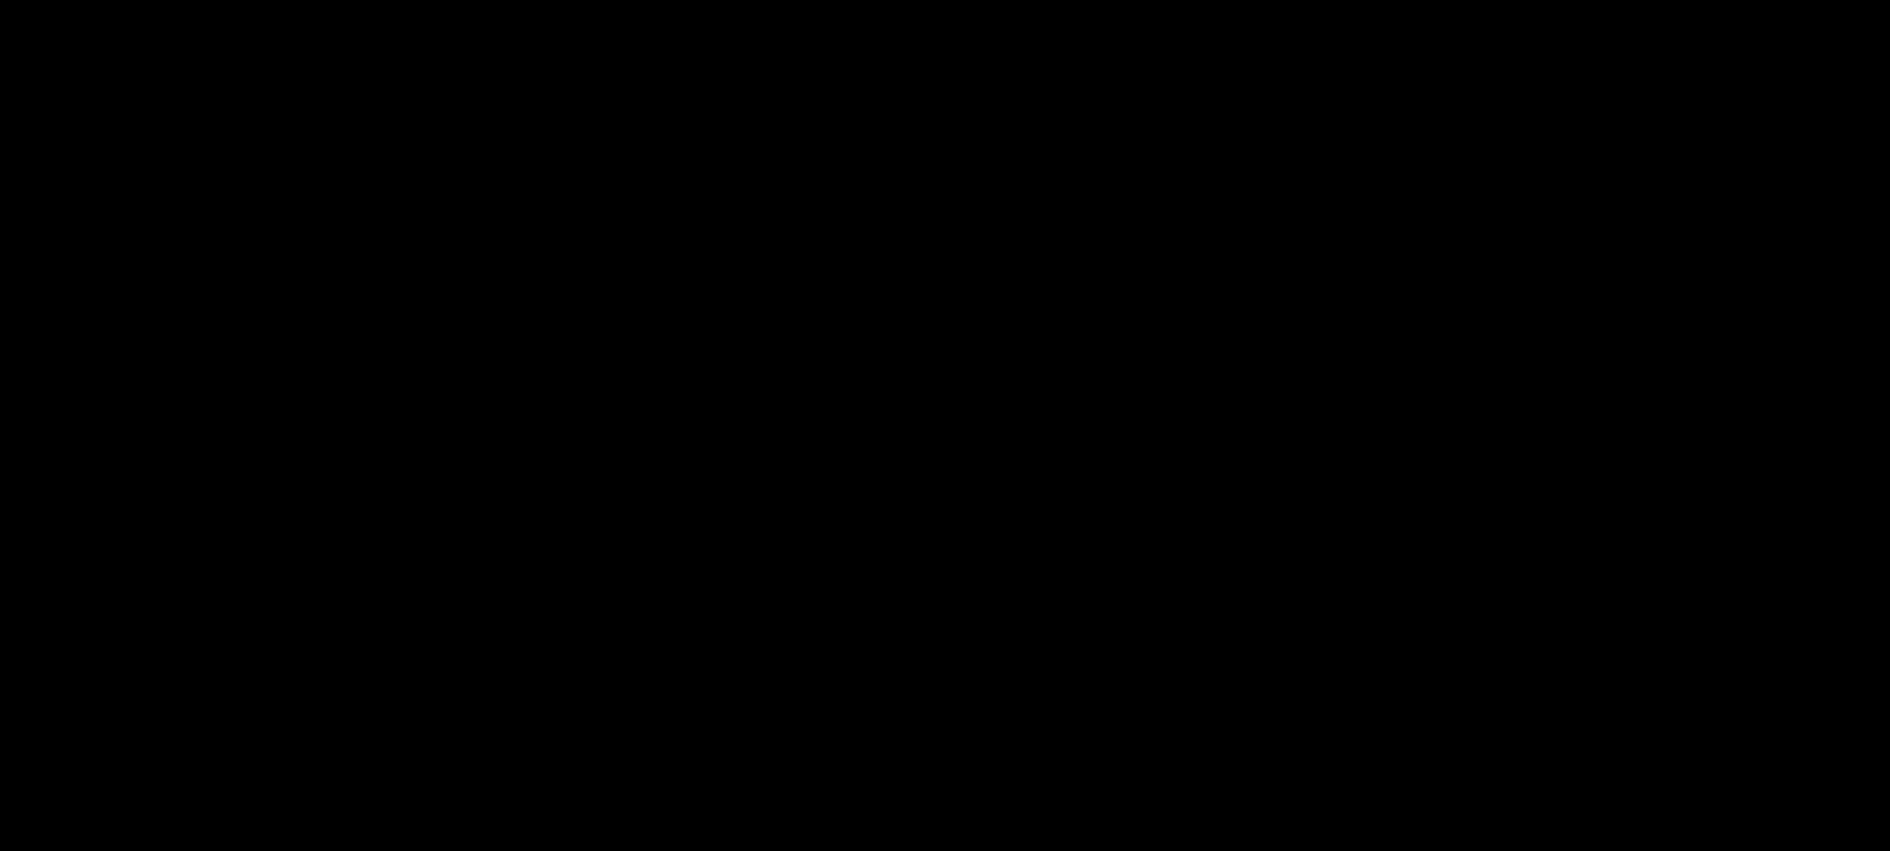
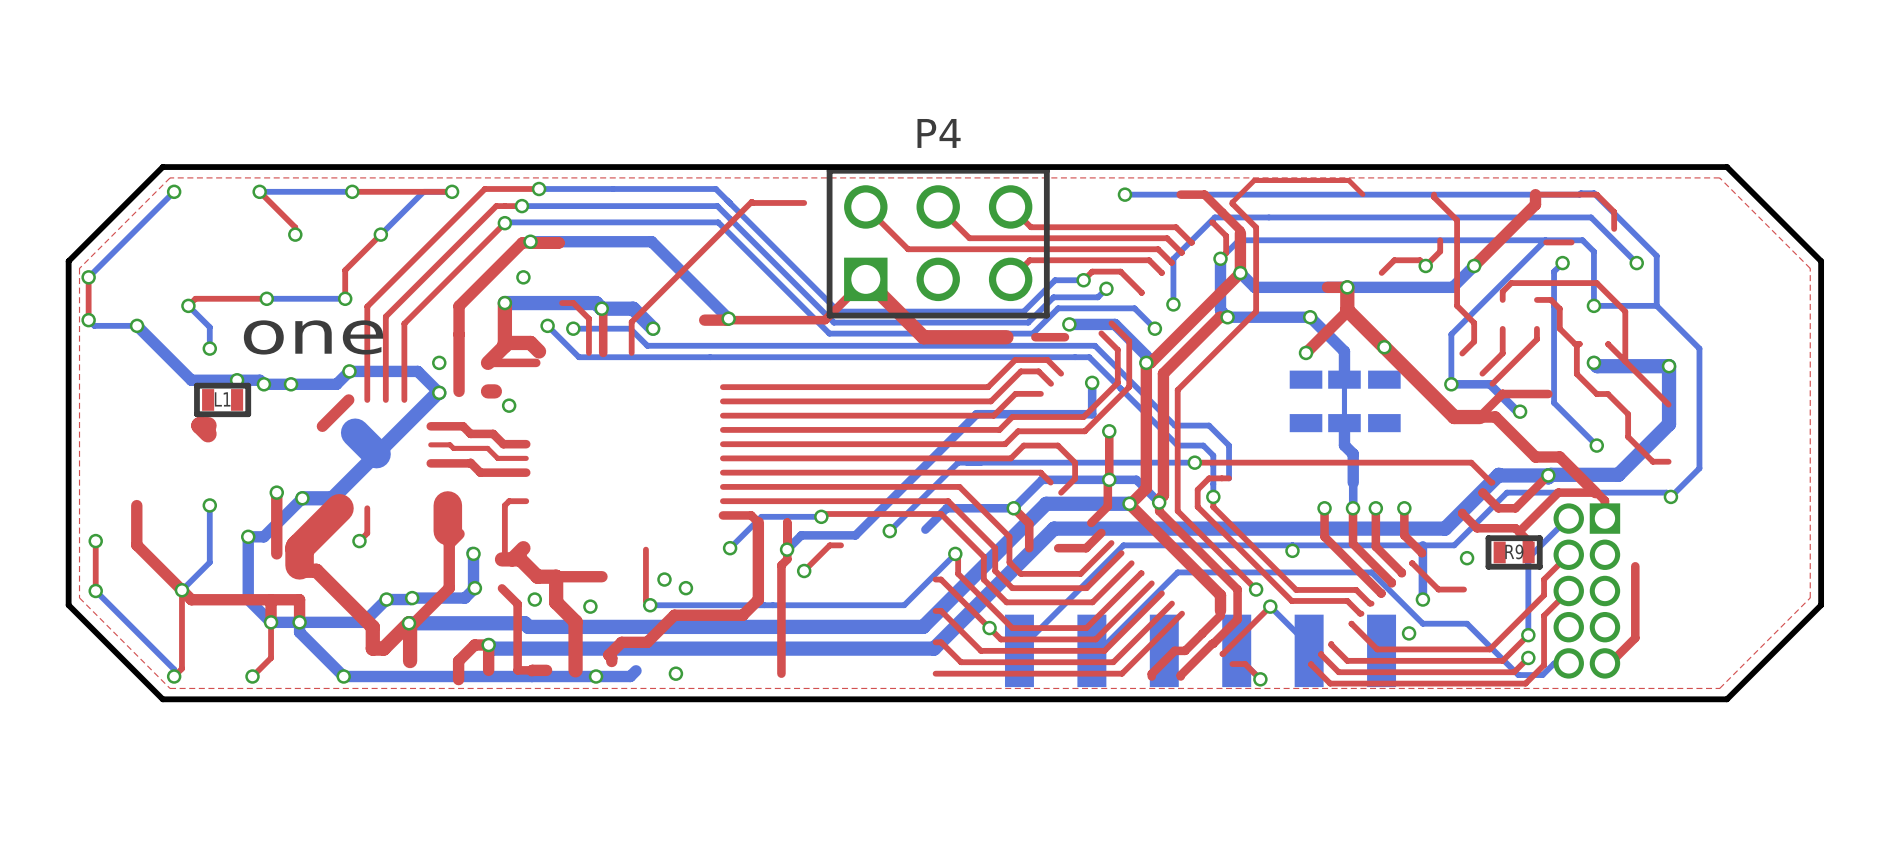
board edge: none -> (162, 167) (1726, 167) (1821, 261) (1821, 605) (1726, 699) (162, 699) (68, 605) (68, 261) (162, 167)
top zone outline: none -> (170, 177) (1719, 177) (1810, 268) (1810, 597) (1719, 688) (170, 688) (79, 597) (79, 268) (170, 177)
top track: none -> (539, 189) (484, 189) (367, 306) (367, 399)
bottom track: none -> (539, 189) (715, 189) (838, 311) (1023, 311) (1055, 280) (1083, 280)
via: none -> (539, 189)
bottom track: none -> (174, 191) (88, 277)
via: none -> (174, 191)
top track: none -> (259, 191) (295, 227) (295, 234)
bottom track: none -> (259, 191) (352, 191)
via: none -> (259, 191)
top track: none -> (352, 191) (452, 191)
via: none -> (352, 191)
bottom track: none -> (452, 191) (423, 191) (380, 234)
via: none -> (452, 191)
bottom track: none -> (1124, 194) (1594, 193) (1656, 255) (1656, 305)
via: none -> (1124, 194)
top track: none -> (1180, 194) (1204, 194) (1240, 230) (1240, 273) (1150, 362) (1146, 362) (1146, 488) (1129, 503)
top track: none -> (1362, 194) (1348, 180) (1254, 180) (1232, 202) (1256, 227) (1256, 311) (1177, 390) (1177, 511) (1256, 589)
top track: none -> (1434, 194) (1434, 197) (1457, 220) (1457, 305) (1474, 322) (1474, 341) (1462, 353)
top track: none -> (804, 202) (751, 201) (631, 321) (631, 352)
top track: none -> (521, 206) (496, 206) (385, 316) (385, 399)
bottom track: none -> (521, 206) (717, 206) (833, 322) (1028, 322) (1053, 297) (1097, 297) (1106, 288)
via: none -> (521, 206)
top track: none -> (865, 206) (908, 249) (1158, 249) (1171, 262)
top track: none -> (938, 206) (969, 238) (1167, 238) (1181, 252)
top track: none -> (1010, 206) (1030, 227) (1176, 227) (1192, 242)
top track: none -> (1212, 222) (1226, 236) (1226, 253) (1220, 258)
top track: none -> (504, 223) (404, 323) (404, 399)
bottom track: none -> (504, 223) (718, 222) (829, 333) (1032, 333) (1058, 308) (1134, 308) (1154, 328)
via: none -> (504, 223)
top track: none -> (1614, 228) (1614, 212) (1596, 194) (1535, 194) (1535, 204) (1474, 265)
via: none -> (295, 234)
top track: none -> (380, 234) (345, 270) (345, 298)
via: none -> (380, 234)
top track: none -> (1440, 240) (1440, 251) (1425, 265) (1420, 260) (1394, 260) (1381, 272)
bottom track: none -> (1545, 240) (1451, 334) (1451, 384) (1489, 384) (1517, 411) (1520, 411)
bottom track: none -> (530, 241) (651, 241) (728, 318)
via: none -> (530, 241)
top track: none -> (559, 242) (522, 242) (459, 306) (459, 391)
top track: none -> (1546, 242) (1571, 242)
P4: none -> (938, 243)
via: none -> (1220, 258)
bottom track: none -> (1562, 263) (1554, 271) (1554, 402) (1596, 445)
via: none -> (1562, 263)
bottom track: none -> (1636, 263) (1591, 217) (1214, 217) (1173, 258) (1173, 304)
via: none -> (1636, 263)
via: none -> (1425, 265)
bottom track: none -> (1474, 265) (1452, 287) (1254, 287) (1240, 273)
via: none -> (1474, 265)
top track: none -> (1161, 272) (1149, 260) (1029, 260) (1010, 279)
via: none -> (1240, 273)
top track: none -> (88, 277) (88, 320)
via: none -> (88, 277)
via: none -> (523, 277)
top track: none -> (1083, 280) (1092, 271) (1120, 271) (1141, 292)
via: none -> (1083, 280)
top track: none -> (1327, 287) (1347, 287) (1347, 310)
via: none -> (1347, 287)
via: none -> (1106, 288)
top track: none -> (266, 298) (195, 298) (188, 305)
bottom track: none -> (266, 298) (345, 298)
via: none -> (266, 298)
via: none -> (345, 298)
top track: none -> (1502, 299) (1502, 291) (1511, 283) (1596, 283) (1625, 311) (1625, 361)
top track: none -> (1536, 299) (1550, 299) (1559, 308) (1559, 328) (1575, 344) (1579, 344)
top track: none -> (504, 303) (504, 346) (488, 362) (536, 362)
bottom track: none -> (504, 303) (596, 303) (601, 308) (633, 308) (653, 328)
via: none -> (504, 303)
top track: none -> (562, 303) (573, 303) (588, 318) (588, 352)
via: none -> (1173, 304)
bottom track: none -> (188, 305) (209, 327) (209, 348)
via: none -> (188, 305)
via: none -> (1593, 305)
bottom track: none -> (1656, 305) (1593, 305) (1593, 251) (1582, 240) (1239, 240) (1220, 258) (1220, 310) (1227, 317) (1310, 317) (1344, 351) (1344, 445) (1353, 454) (1353, 508)
bottom track: none -> (1656, 305) (1699, 348) (1699, 468) (1670, 496) (1666, 492) (1506, 492) (1454, 545) (1123, 545) (1019, 650)
top track: none -> (601, 308) (603, 352)
via: none -> (601, 308)
top track: none -> (1347, 310) (1454, 417) (1495, 417) (1535, 457) (1559, 457) (1595, 492)
top track: none -> (1347, 311) (1306, 352)
top track: none -> (1227, 317) (1219, 317) (1163, 373) (1163, 495) (1159, 499) (1159, 511) (1237, 589) (1237, 619) (1180, 676)
via: none -> (1227, 317)
via: none -> (1310, 317)
top track: none -> (728, 318) (704, 320) (825, 320) (865, 279) (923, 337) (1006, 337)
via: none -> (728, 318)
bottom track: none -> (88, 320) (94, 325) (137, 325) (191, 380) (259, 380) (263, 384) (336, 384) (349, 371) (417, 371) (439, 392) (332, 498) (302, 498) (263, 536) (248, 536) (248, 599) (271, 622) (363, 622) (386, 599) (464, 598) (474, 588) (472, 552)
via: none -> (88, 320)
top track: none -> (1111, 323) (1129, 341) (1129, 386) (1084, 431) (1018, 431) (1005, 444) (722, 444)
bottom track: none -> (1069, 324) (1114, 324) (1146, 355) (1146, 362)
via: none -> (1069, 324)
via: none -> (137, 325)
bottom track: none -> (547, 325) (578, 357) (1089, 357) (1177, 445) (1203, 445) (1213, 455) (1213, 496)
via: none -> (547, 325)
bottom track: none -> (573, 328) (630, 328) (647, 345) (1095, 345) (1174, 425) (1209, 425) (1229, 445) (1229, 478)
via: none -> (573, 328)
via: none -> (653, 328)
via: none -> (1154, 328)
top track: none -> (1502, 328) (1502, 353) (1482, 373)
top track: none -> (1536, 328) (1536, 339) (1492, 383)
top track: none -> (1101, 333) (1117, 349) (1117, 382) (1083, 417) (1012, 417) (999, 429) (722, 429)
top track: none -> (1035, 337) (1064, 337)
text: none -> one (313, 337)
top track: none -> (504, 342) (530, 342) (539, 351)
top track: none -> (1578, 344) (1576, 345) (1576, 374) (1596, 394) (1607, 394) (1628, 414) (1628, 436) (1652, 461) (1668, 461)
top track: none -> (1608, 344) (1668, 404)
via: none -> (1384, 347)
via: none -> (209, 348)
via: none -> (1306, 352)
via: none -> (439, 362)
via: none -> (1146, 362)
bottom track: none -> (1593, 362) (1597, 366) (1669, 366) (1669, 424) (1618, 474) (1550, 474) (1548, 477) (1548, 475) (1498, 475)
via: none -> (1593, 362)
via: none -> (1669, 366)
via: none -> (349, 371)
top track: none -> (1061, 373) (1047, 360) (1015, 360) (988, 387) (722, 387)
via: none -> (237, 380)
bottom track: none -> (1092, 382) (1092, 414) (976, 414) (855, 535) (801, 535) (787, 549)
via: none -> (1092, 382)
top track: none -> (1051, 383) (1038, 371) (1020, 371) (990, 401) (722, 401)
via: none -> (263, 384)
via: none -> (291, 384)
via: none -> (1451, 384)
top track: none -> (488, 391) (494, 391) (488, 391)
via: none -> (439, 392)
top track: none -> (1040, 393) (1015, 393) (993, 415) (722, 415)
top track: none -> (1548, 394) (1502, 394) (1479, 416)
L1: none -> (222, 399)
top track: none -> (348, 399) (322, 426)
part: none -> (1306, 401)
part: none -> (1344, 401)
part: none -> (1384, 401)
via: none -> (509, 405)
via: none -> (1520, 411)
top track: none -> (208, 425) (199, 425) (208, 433)
top track: none -> (430, 426) (463, 426) (470, 433) (493, 433) (503, 444) (526, 444)
top track: none -> (1109, 431) (1107, 506) (1091, 522)
via: none -> (1109, 431)
bottom track: none -> (355, 432) (376, 454)
top track: none -> (430, 444) (449, 444) (453, 448) (487, 448) (497, 458) (526, 458)
via: none -> (1596, 445)
top track: none -> (722, 458) (1010, 458) (1023, 445) (1057, 445) (1075, 462) (1075, 478) (1061, 492)
top track: none -> (1194, 462) (1471, 462) (1492, 482)
bottom track: none -> (1194, 462) (958, 462) (889, 531)
via: none -> (1194, 462)
top track: none -> (430, 463) (470, 462) (480, 472) (526, 472)
top track: none -> (722, 472) (1040, 472) (1050, 482)
bottom track: none -> (1498, 474) (1445, 528) (1054, 528) (934, 648) (492, 648) (488, 645)
top track: none -> (1548, 475) (1515, 508) (1498, 508) (1482, 492)
via: none -> (1548, 475)
top track: none -> (1229, 478) (1209, 478) (1197, 489) (1197, 506) (1291, 600) (1347, 600) (1361, 613)
via: none -> (1109, 479)
top track: none -> (722, 486) (959, 486) (1009, 536) (1009, 562) (1020, 573) (1080, 573) (1111, 543)
top track: none -> (276, 492) (276, 553)
via: none -> (276, 492)
top track: none -> (1213, 496) (1213, 507) (1296, 589) (1356, 589) (1371, 603)
via: none -> (1213, 496)
via: none -> (1670, 496)
via: none -> (302, 498)
top track: none -> (526, 501) (509, 501) (504, 505) (504, 556) (501, 559) (520, 559) (537, 576) (556, 576)
top track: none -> (722, 501) (948, 501) (995, 548) (995, 570) (1012, 588) (1086, 588) (1121, 553)
bottom track: none -> (1159, 502) (1136, 479) (1042, 479) (1013, 508) (946, 508) (925, 529)
via: none -> (1159, 502)
bottom track: none -> (1129, 503) (1046, 503) (923, 626) (528, 626) (524, 623) (409, 623)
via: none -> (1129, 503)
top track: none -> (1129, 504) (1220, 595) (1220, 615) (1185, 650) (1174, 650) (1151, 673) (1151, 676)
top track: none -> (136, 505) (136, 545) (191, 599) (299, 599) (299, 622)
bottom track: none -> (209, 505) (209, 562) (181, 590)
via: none -> (209, 505)
top track: none -> (459, 505) (447, 505) (447, 531) (450, 533) (459, 533) (449, 543) (449, 588) (414, 623) (409, 623)
top track: none -> (348, 508) (339, 508) (299, 548) (299, 570) (316, 570) (372, 627) (372, 648) (383, 648) (409, 623)
top track: none -> (367, 508) (367, 533) (359, 541)
top track: none -> (1013, 508) (1029, 523) (1029, 548)
via: none -> (1013, 508)
top track: none -> (1324, 508) (1324, 536) (1381, 593)
via: none -> (1324, 508)
top track: none -> (1353, 508) (1353, 543) (1391, 583)
via: none -> (1353, 508)
top track: none -> (1375, 508) (1375, 546) (1401, 573)
via: none -> (1375, 508)
top track: none -> (1404, 508) (1404, 535) (1421, 553)
via: none -> (1404, 508)
top track: none -> (1462, 512) (1477, 528) (1515, 528) (1528, 541) (1528, 552)
top track: none -> (722, 515) (751, 515) (758, 522) (758, 599) (742, 615) (674, 615) (647, 642) (621, 642) (608, 655) (611, 661)
top track: none -> (821, 516) (824, 514) (941, 514) (983, 556) (983, 579) (1006, 602) (1092, 602) (1131, 563)
bottom track: none -> (821, 516) (761, 516) (730, 548)
via: none -> (821, 516)
bottom track: none -> (1568, 518) (1528, 558) (1528, 635)
top track: none -> (1604, 518) (1604, 500) (1596, 492) (1558, 492) (1519, 531)
top track: none -> (787, 522) (787, 559) (781, 565) (781, 673)
via: none -> (889, 531)
top track: none -> (1101, 532) (1086, 548) (1058, 548)
via: none -> (248, 536)
top track: none -> (95, 541) (95, 590)
via: none -> (95, 541)
via: none -> (359, 541)
top track: none -> (841, 545) (829, 545) (804, 570)
bottom track: none -> (1422, 545) (1422, 599)
top track: none -> (523, 548) (512, 559)
via: none -> (730, 548)
top track: none -> (645, 549) (645, 600) (650, 605)
via: none -> (787, 549)
via: none -> (1292, 550)
R9: none -> (1514, 552)
via: none -> (473, 553)
top track: none -> (955, 553) (958, 556) (958, 573) (1012, 628) (1086, 628) (1141, 573)
via: none -> (955, 553)
bottom track: none -> (955, 554) (904, 605) (650, 605)
top track: none -> (1568, 554) (1544, 579) (1544, 595) (1489, 649) (1377, 649) (1351, 623)
via: none -> (1467, 558)
top track: none -> (1412, 563) (1438, 589) (1464, 589)
top track: none -> (1635, 566) (1635, 638) (1609, 663) (1604, 663)
via: none -> (804, 570)
top track: none -> (556, 576) (601, 576)
top track: none -> (556, 576) (556, 602) (575, 621) (575, 670)
via: none -> (664, 579)
top track: none -> (935, 579) (941, 579) (1000, 639) (1095, 639) (1151, 583)
via: none -> (474, 588)
top track: none -> (501, 588) (517, 604) (517, 670) (546, 670) (531, 670)
via: none -> (685, 588)
via: none -> (1256, 589)
bottom track: none -> (95, 590) (174, 669) (174, 676)
via: none -> (95, 590)
top track: none -> (181, 590) (181, 668) (174, 676)
via: none -> (181, 590)
top track: none -> (1568, 590) (1544, 615) (1544, 665) (1525, 683) (1330, 683) (1311, 664)
part: none -> (1586, 590)
top track: none -> (1161, 593) (1104, 650) (981, 650) (941, 610) (935, 610)
via: none -> (412, 598)
top track: none -> (271, 599) (271, 657) (252, 676)
via: none -> (386, 599)
via: none -> (534, 599)
via: none -> (1422, 599)
top track: none -> (1171, 603) (1113, 662) (961, 662) (941, 642) (935, 642)
via: none -> (650, 605)
via: none -> (590, 606)
top track: none -> (1270, 606) (1222, 653)
bottom track: none -> (1270, 606) (1309, 645) (1309, 650)
via: none -> (1270, 606)
top track: none -> (1182, 613) (1122, 673) (935, 673)
via: none -> (271, 622)
bottom track: none -> (299, 622) (299, 632) (343, 676) (630, 676) (636, 670)
via: none -> (299, 622)
top track: none -> (409, 623) (410, 661)
via: none -> (409, 623)
via: none -> (989, 628)
via: none -> (1409, 633)
top track: none -> (1528, 635) (1502, 660) (1347, 660) (1331, 643)
via: none -> (1528, 635)
via: none -> (488, 645)
bottom track: none -> (1091, 650) (1099, 650) (1177, 572) (1371, 572) (1422, 623) (1467, 623) (1518, 675) (1542, 675) (1554, 663) (1568, 663)
part: none -> (1200, 650)
top track: none -> (1321, 653) (1338, 672) (1514, 672) (1528, 657)
via: none -> (1528, 657)
top track: none -> (1232, 664) (1245, 664) (1260, 679)
top track: none -> (488, 670) (488, 645) (474, 645) (458, 661) (458, 679)
via: none -> (675, 673)
via: none -> (174, 676)
via: none -> (252, 676)
via: none -> (343, 676)
via: none -> (596, 676)
via: none -> (1260, 679)

